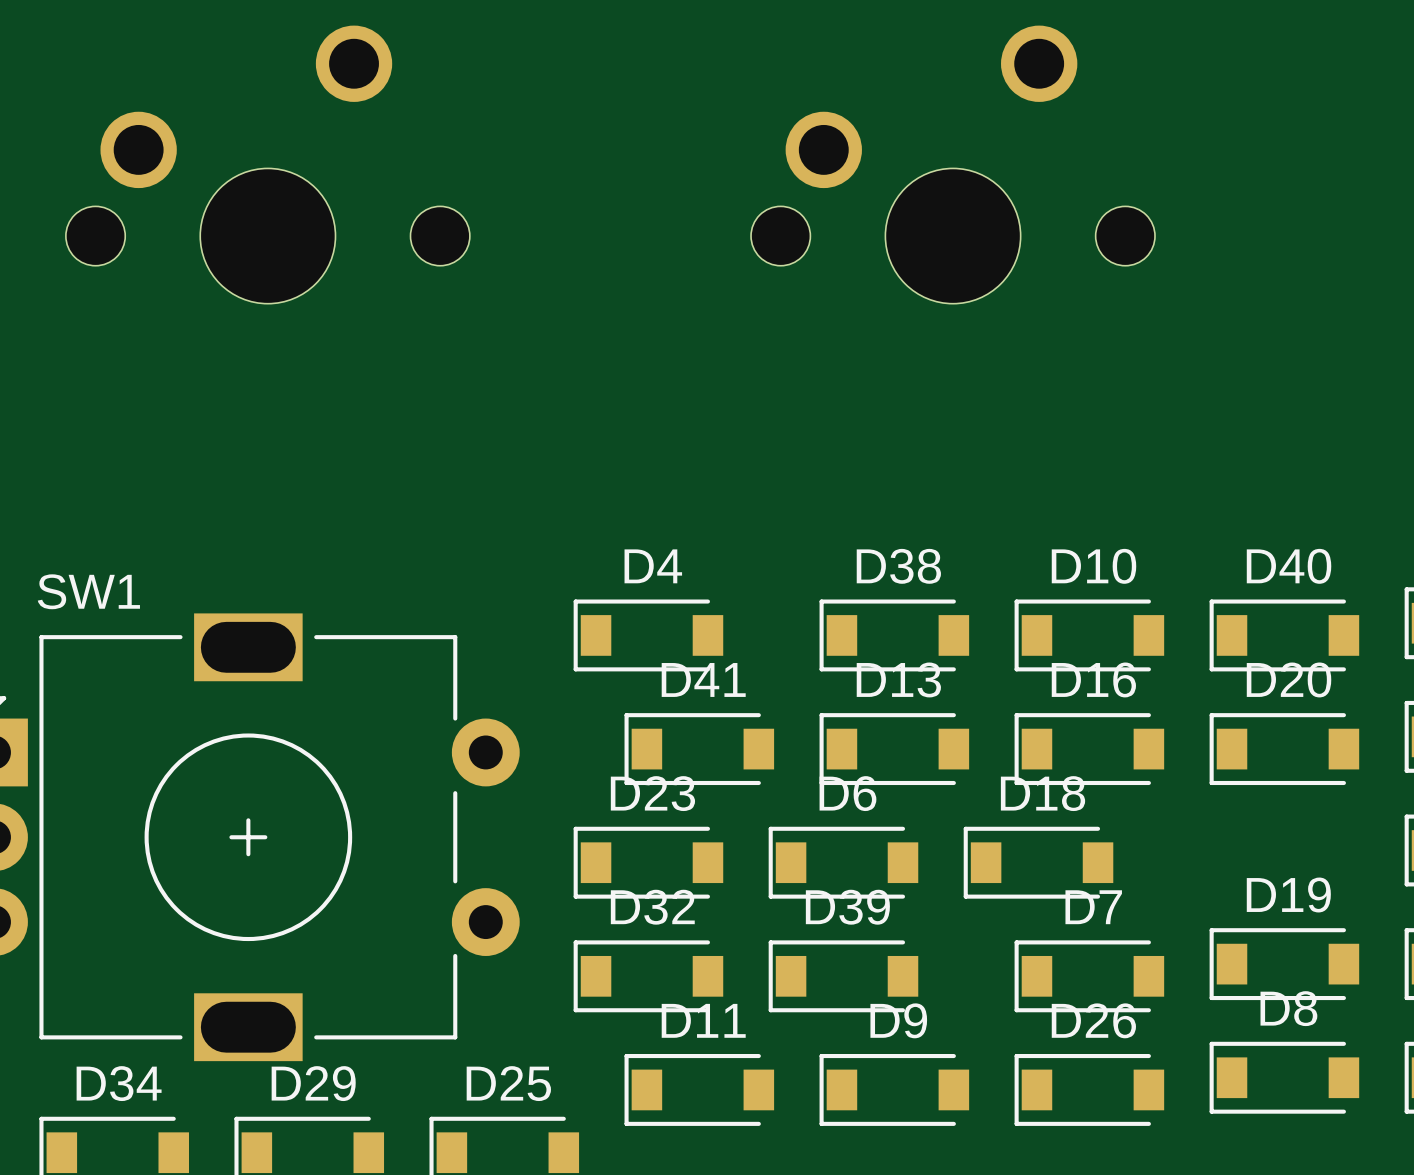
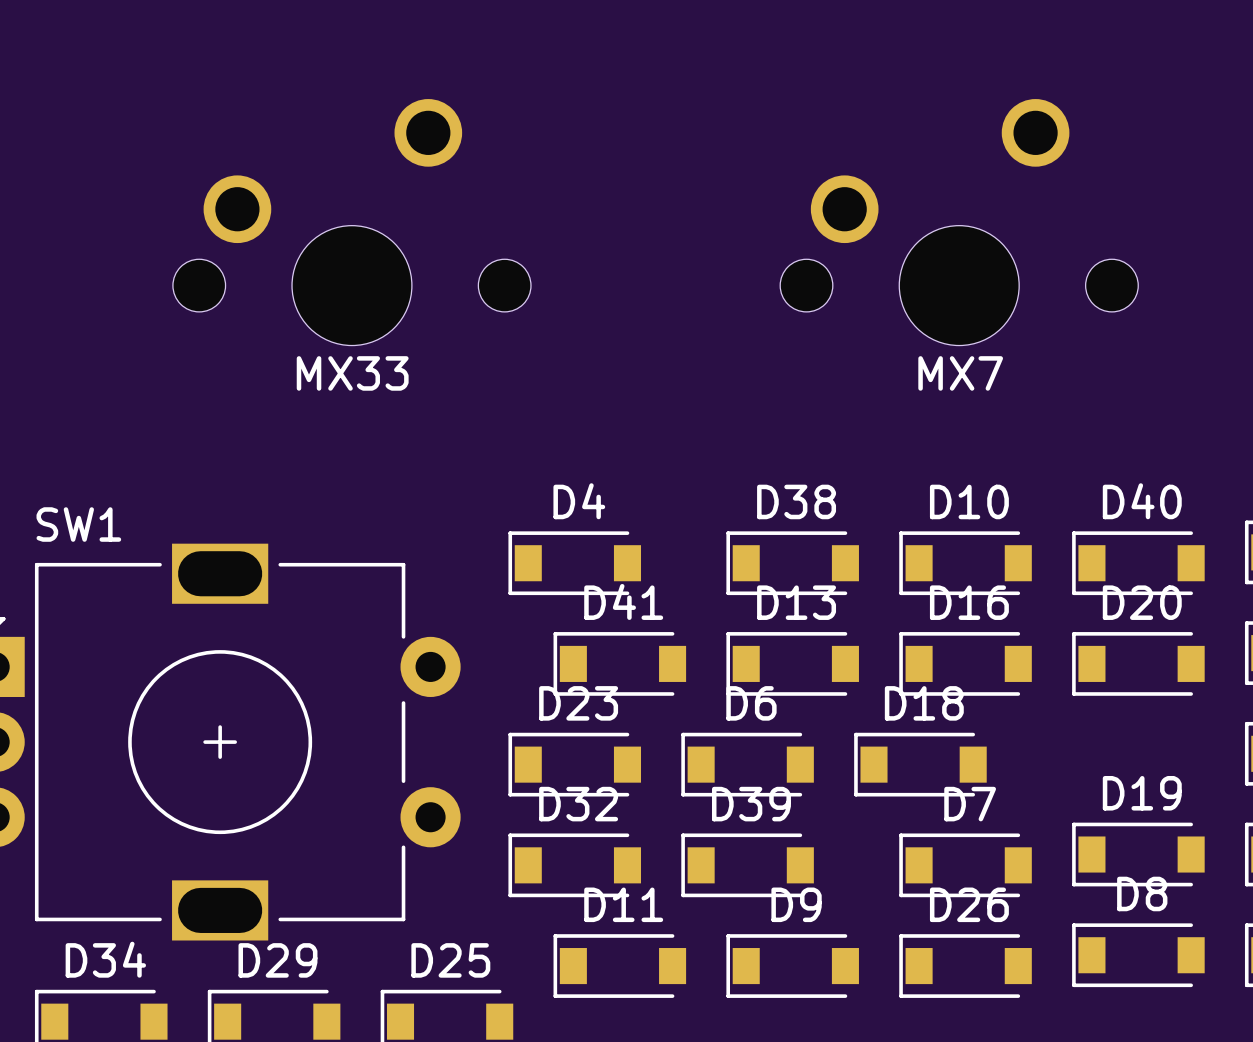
part: (267, 164) -> none
part: (953, 164) -> none
MX33: none -> (351, 222)
MX7: none -> (959, 222)

